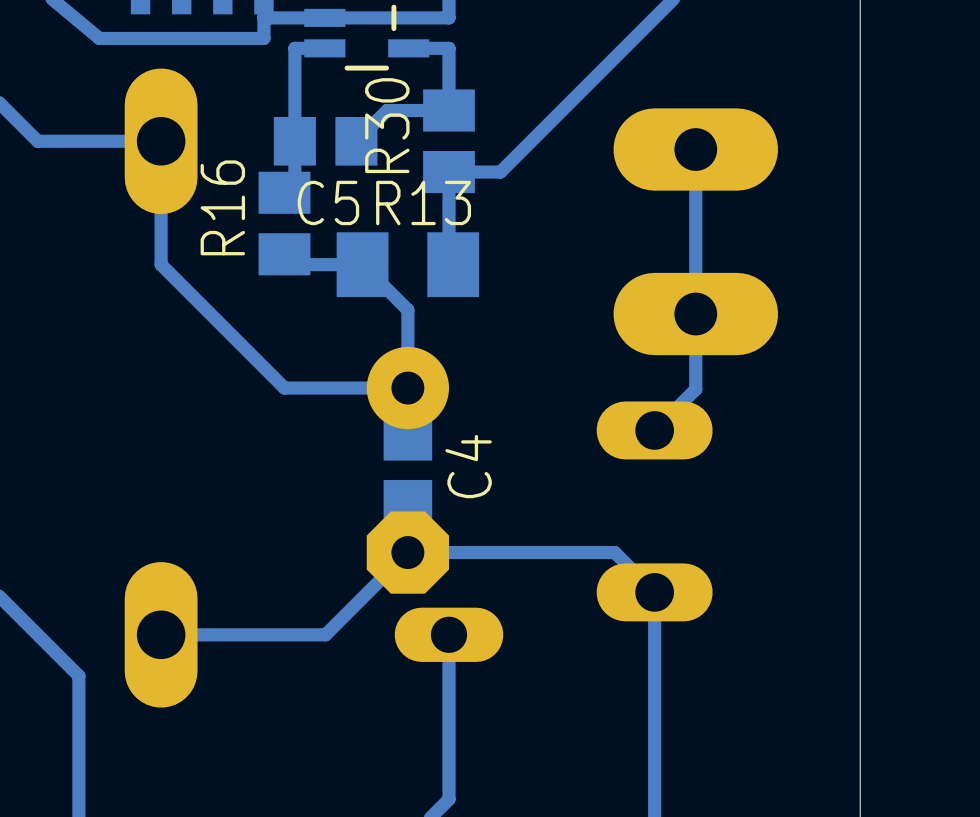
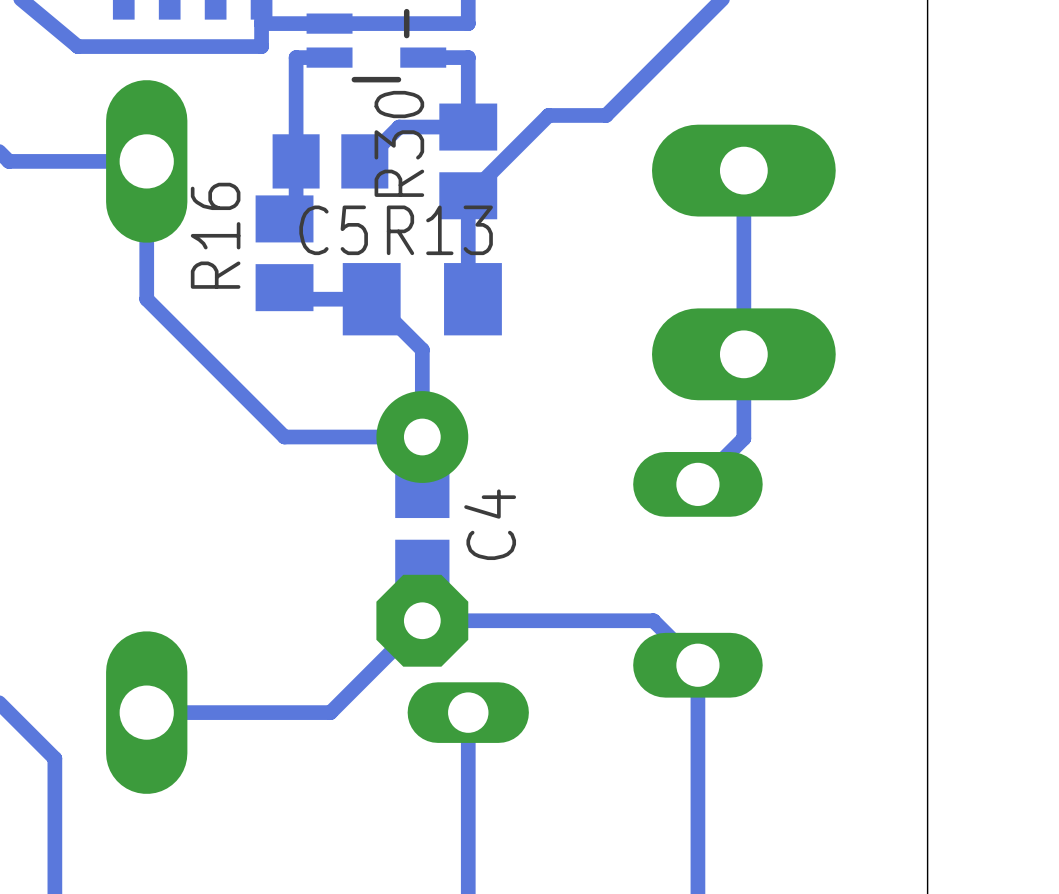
track: (572, 100) (500, 172) (449, 172) -> (606, 115) (548, 115) (468, 195)

